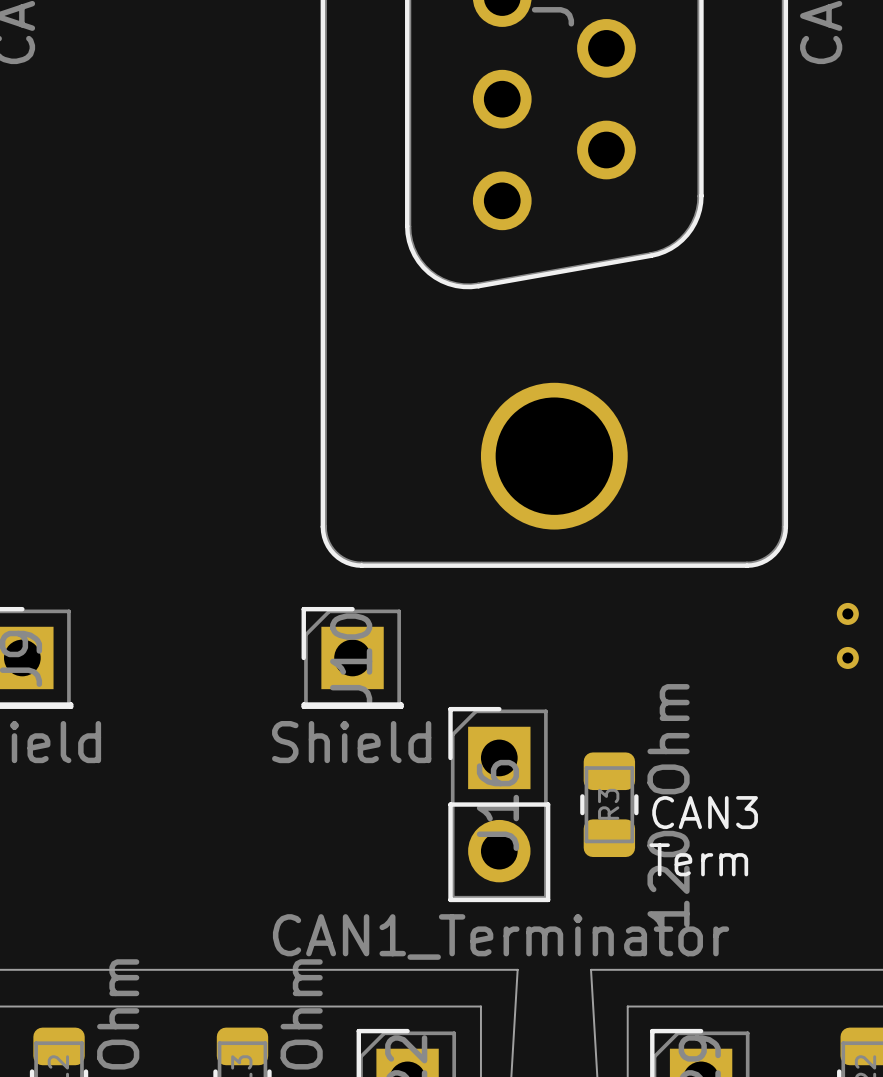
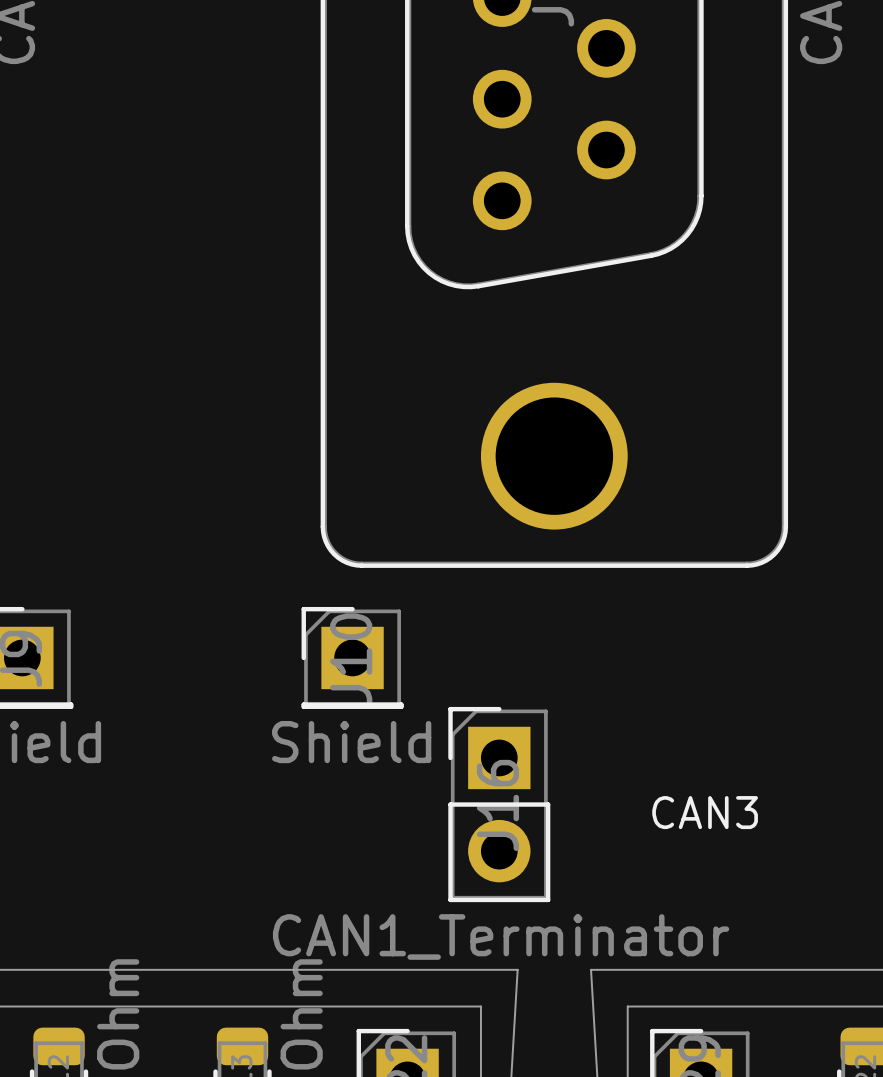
part: (847, 635) -> none
R3: 120 Ohm (609, 804) -> none
text: Term (698, 859) -> none

